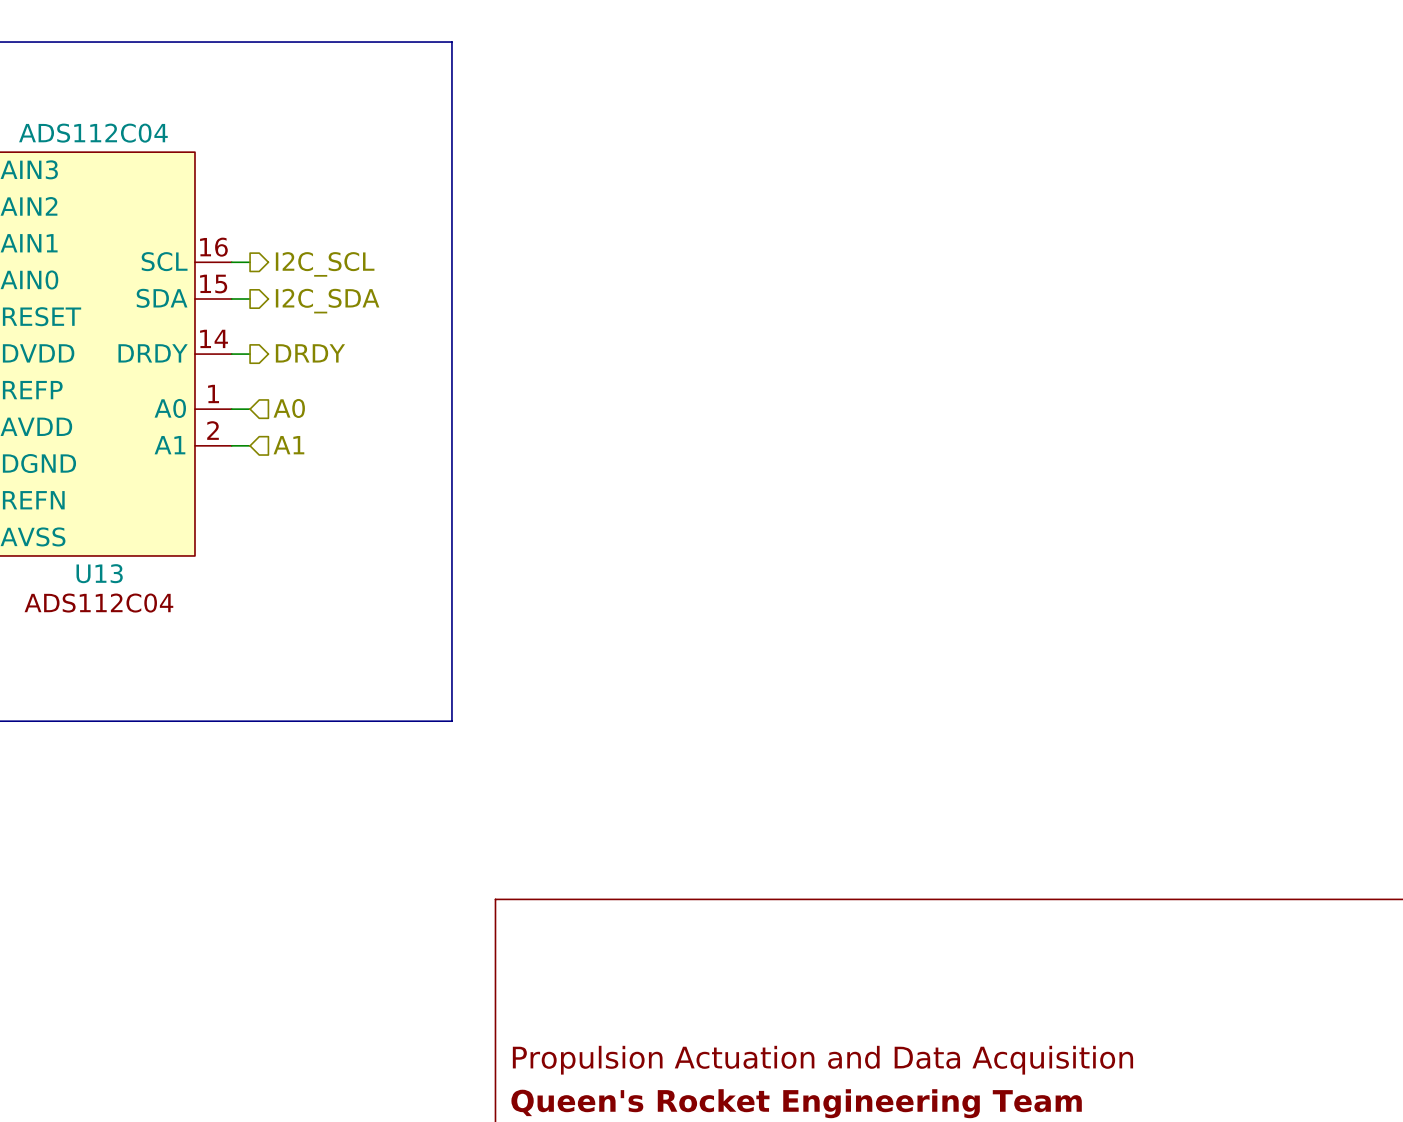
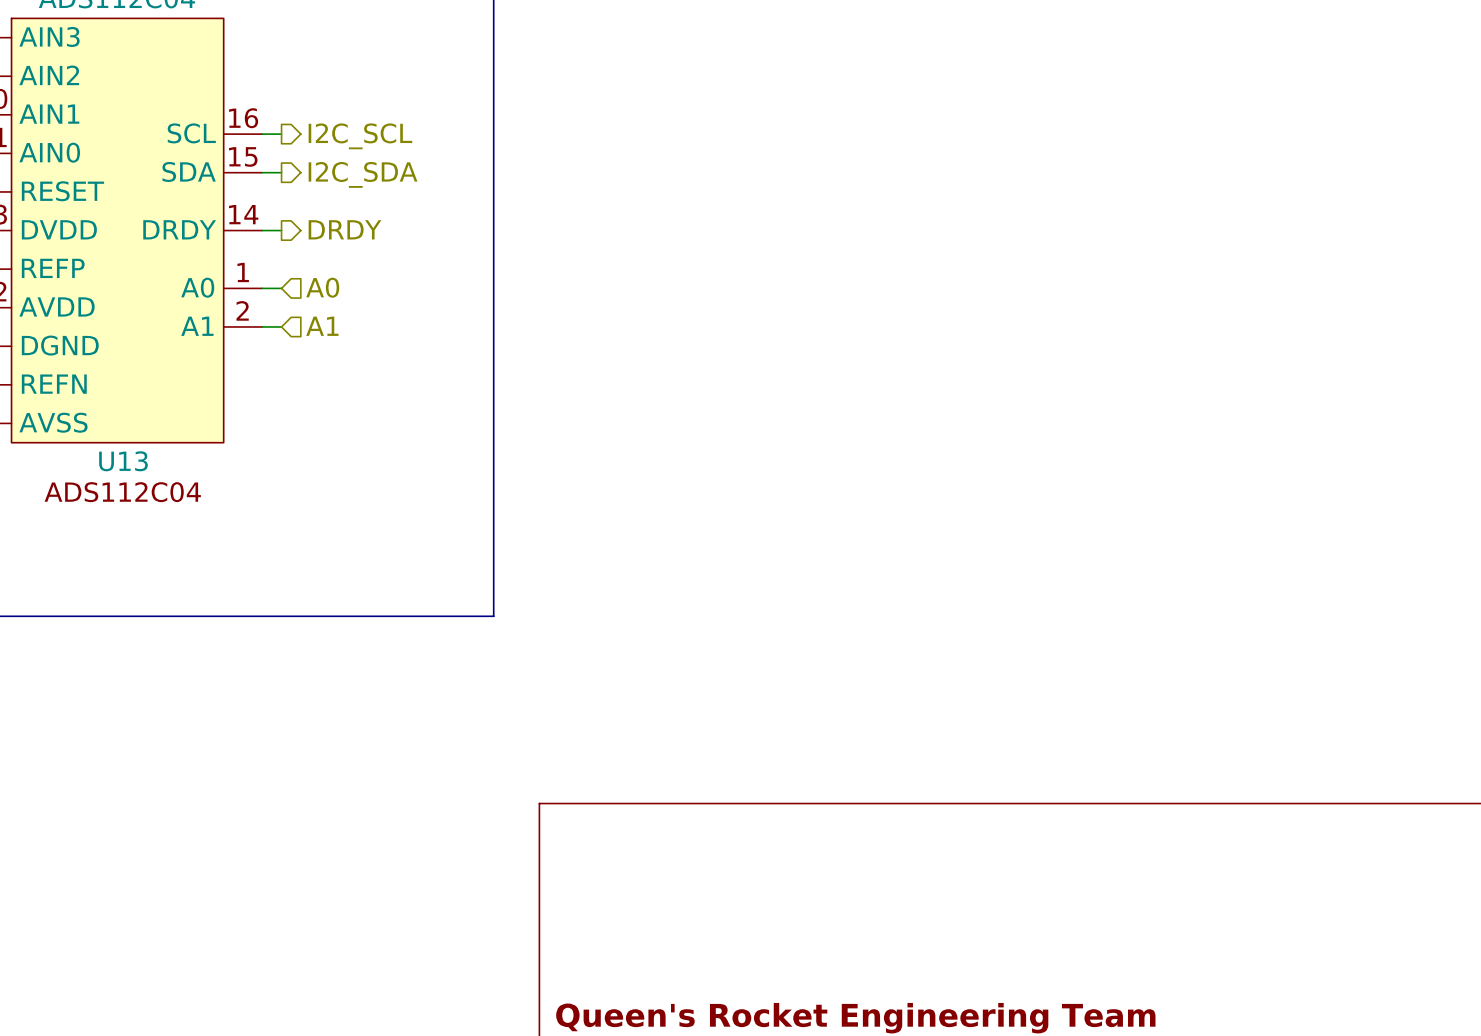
title block: Propulsion Actuation and Data Acquisition (822, 1060) -> none

